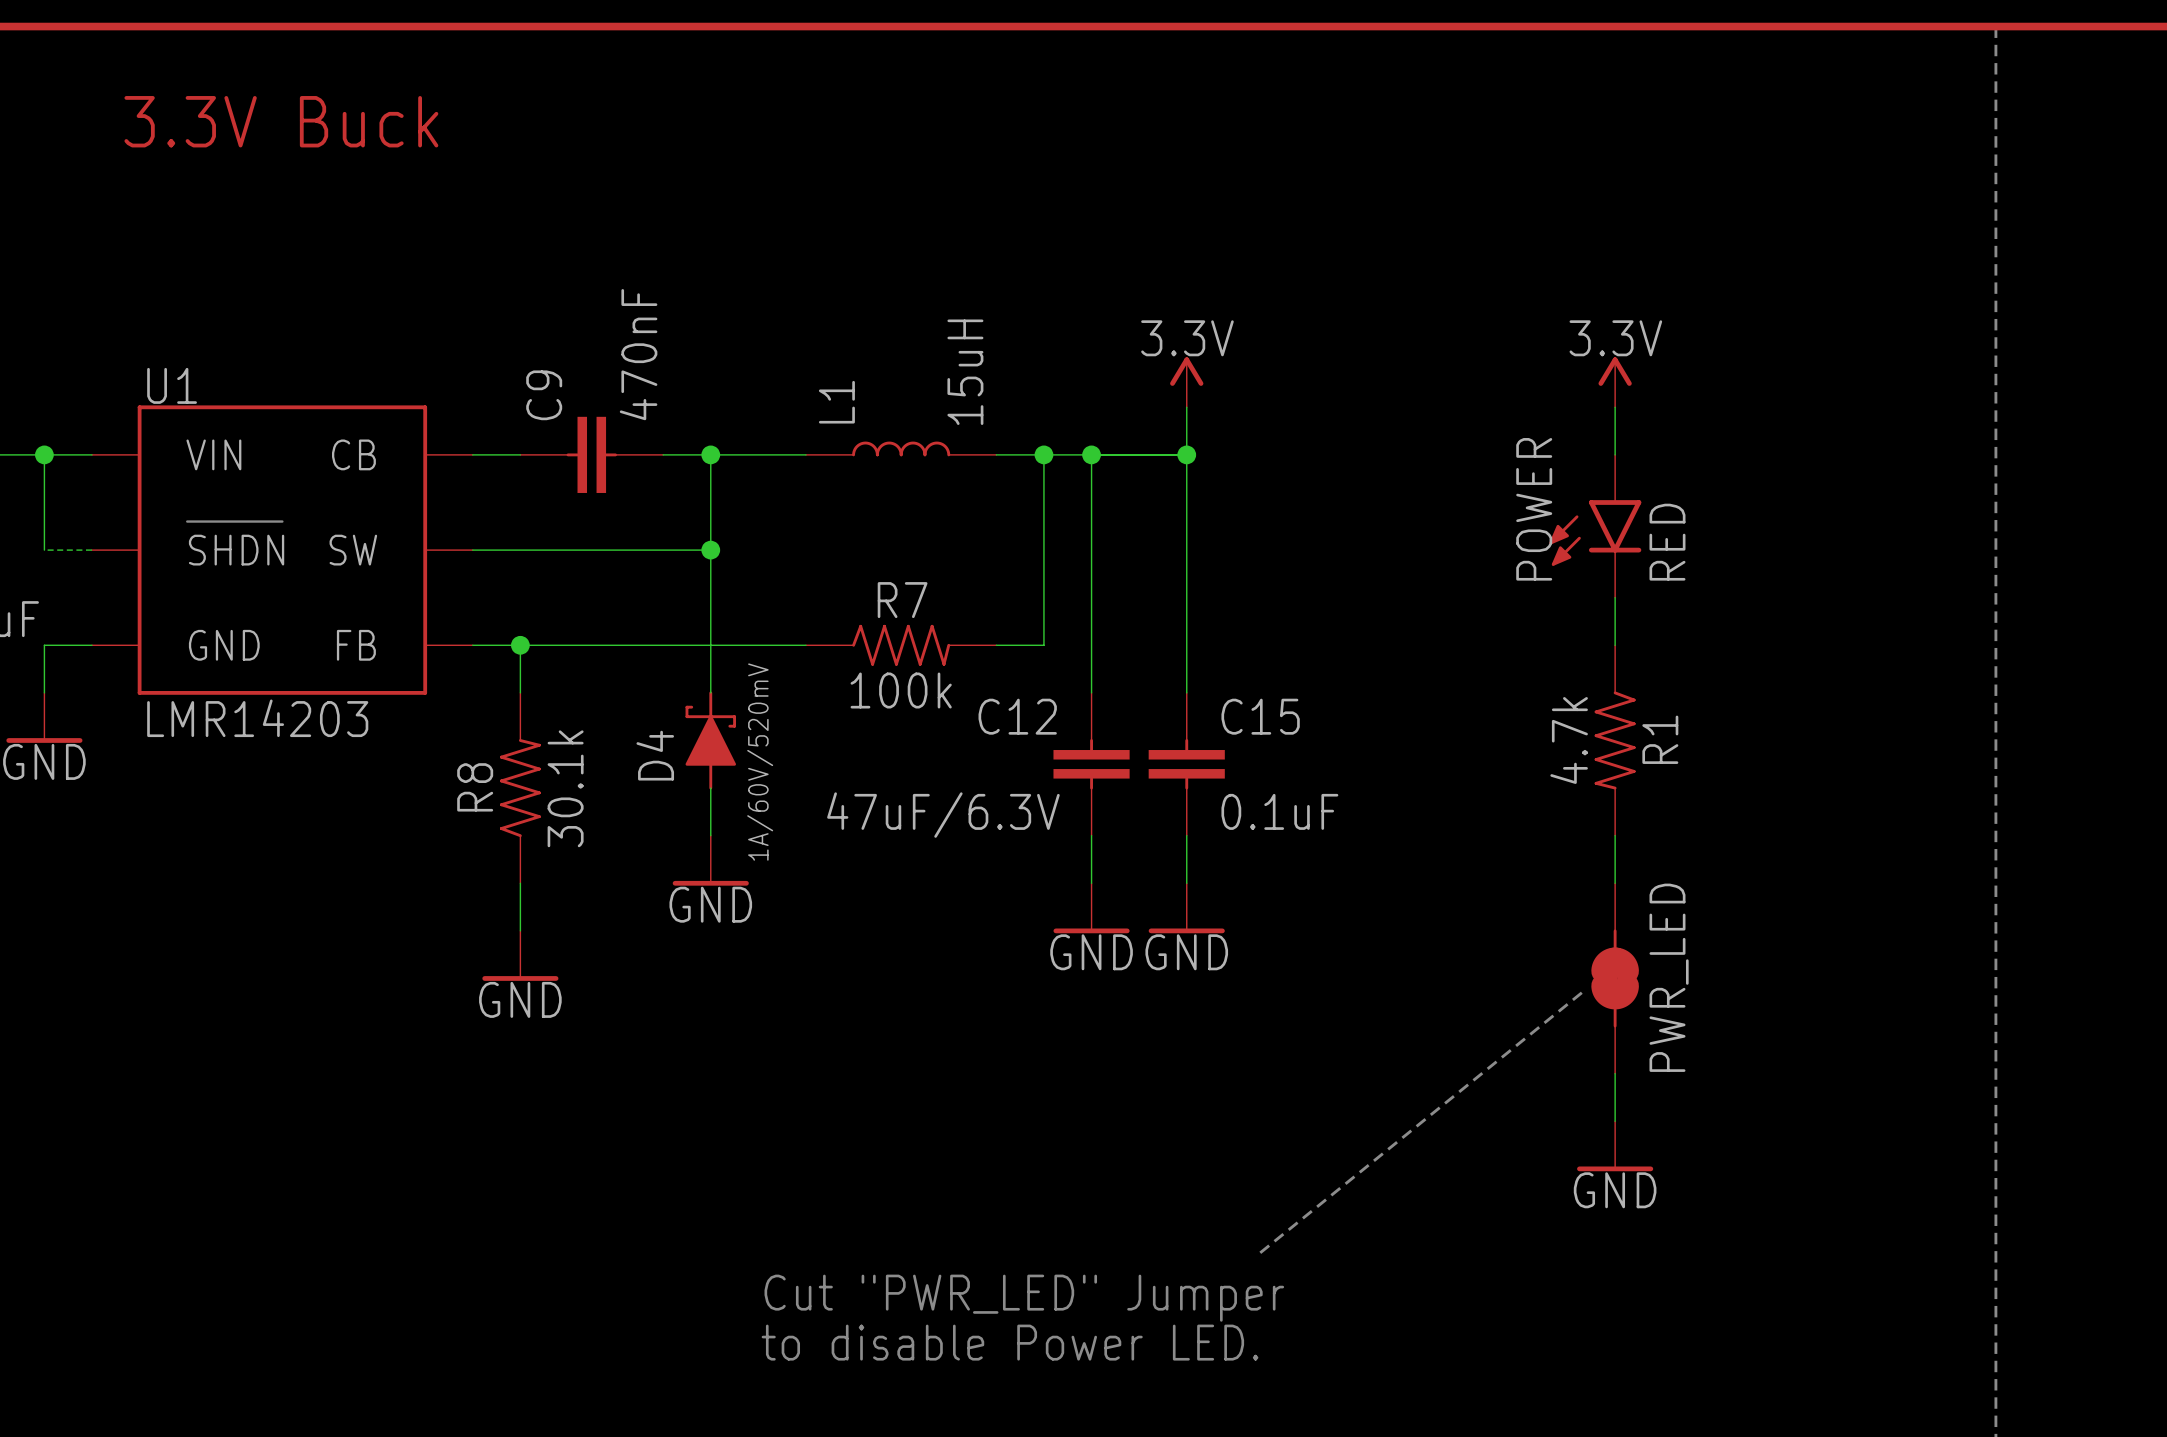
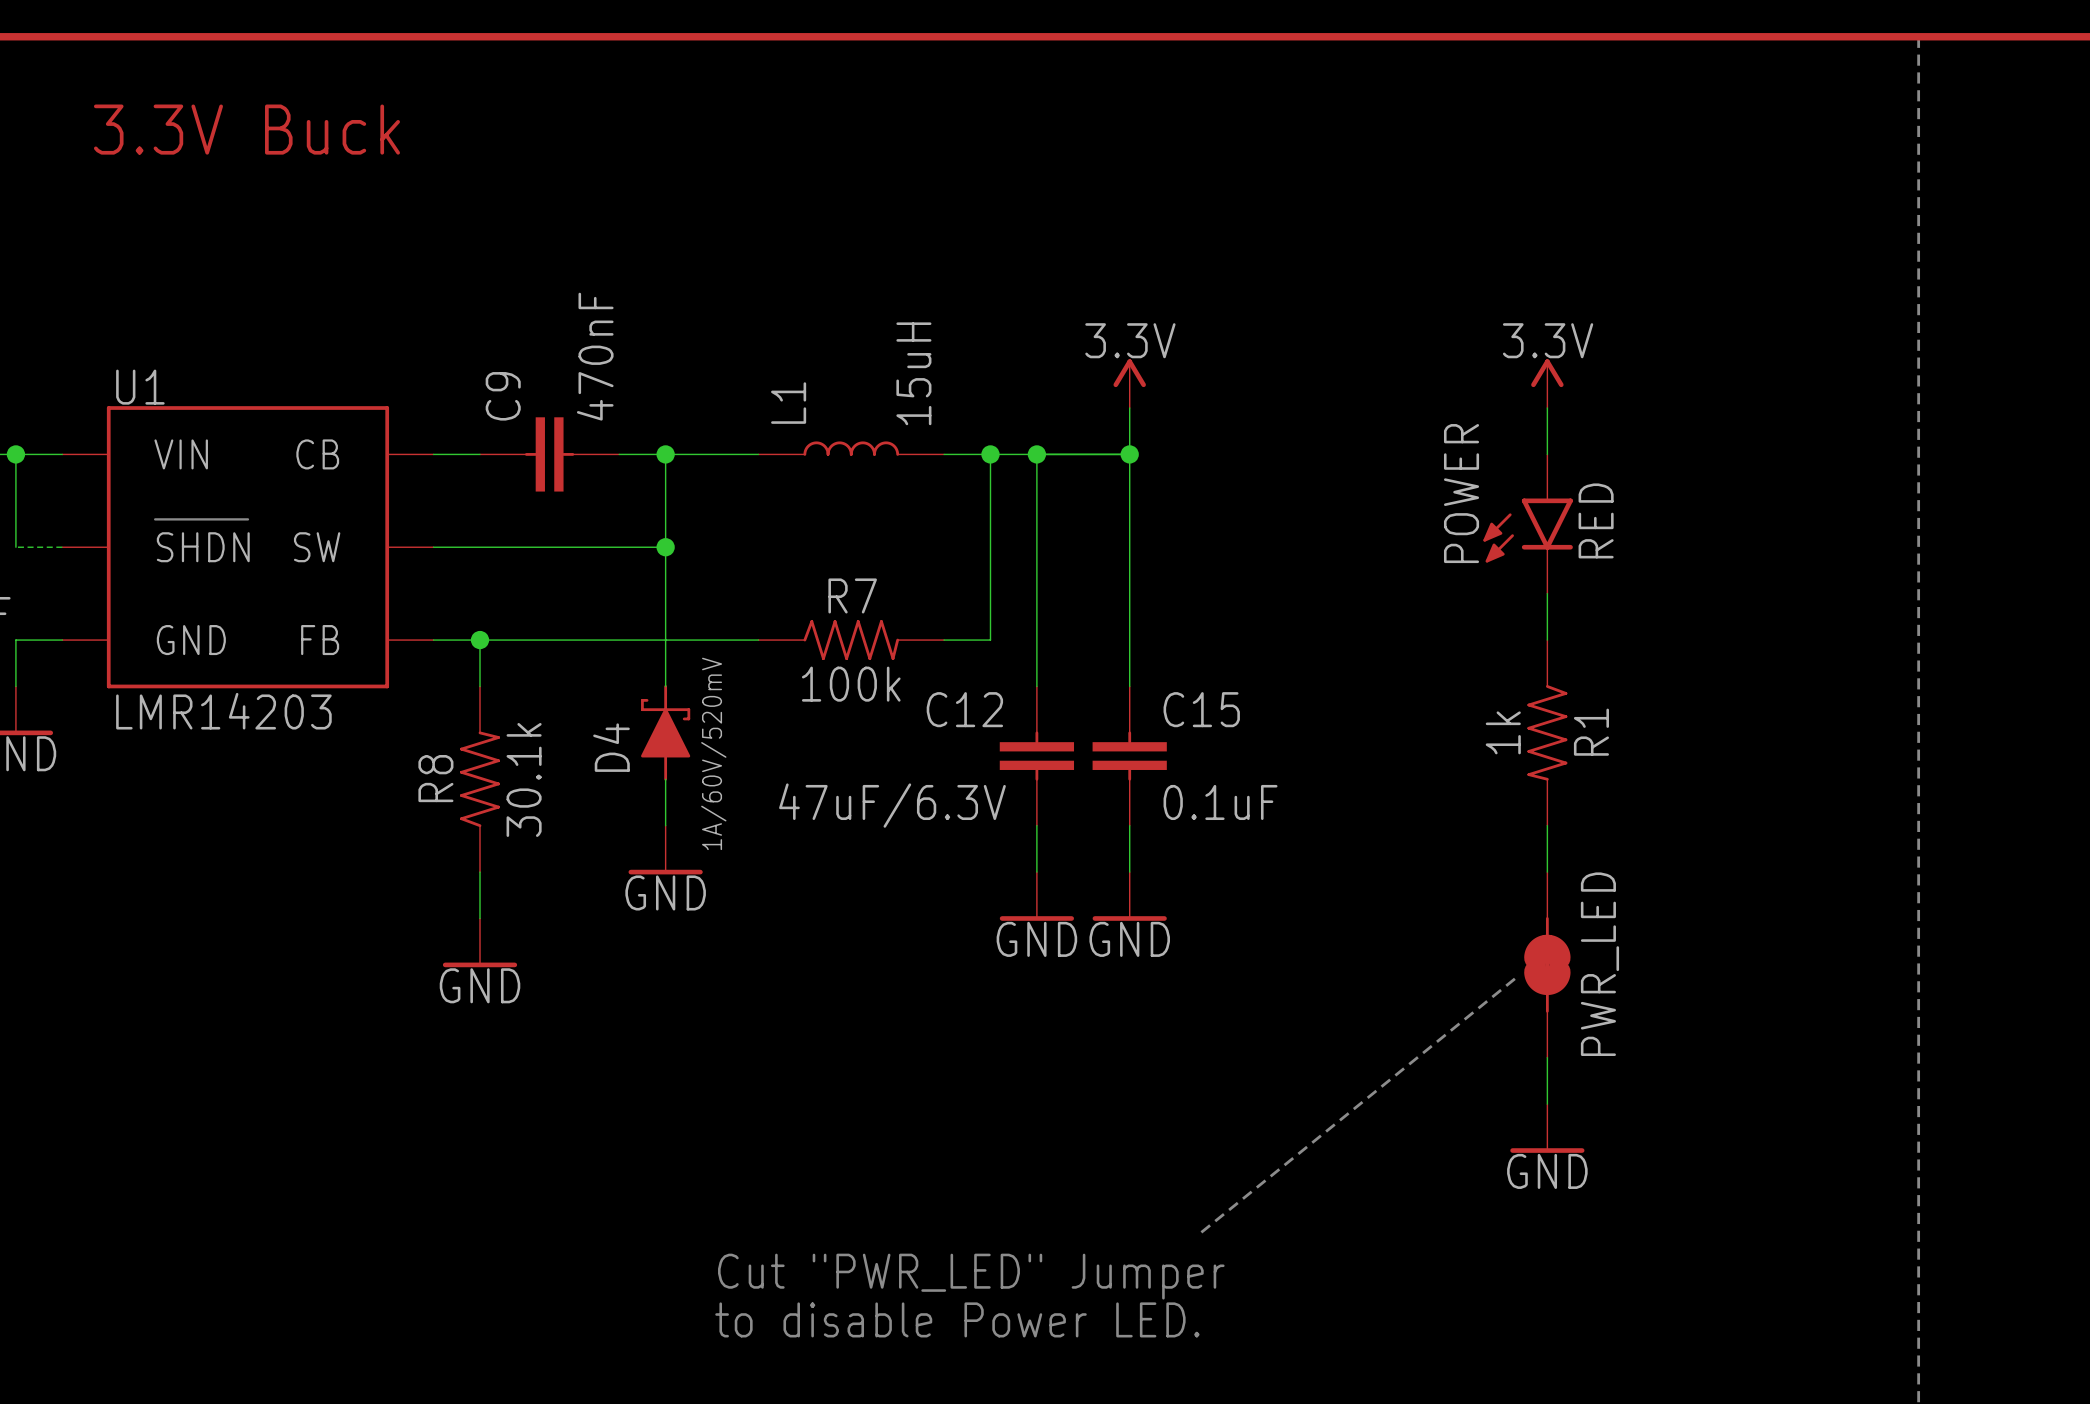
POWER name position: POWER (1534, 509) -> POWER (1461, 493)
POWER value position: RED (1667, 542) -> RED (1596, 520)
R1 value: 4.7k (1569, 740) -> 1k (1503, 732)

